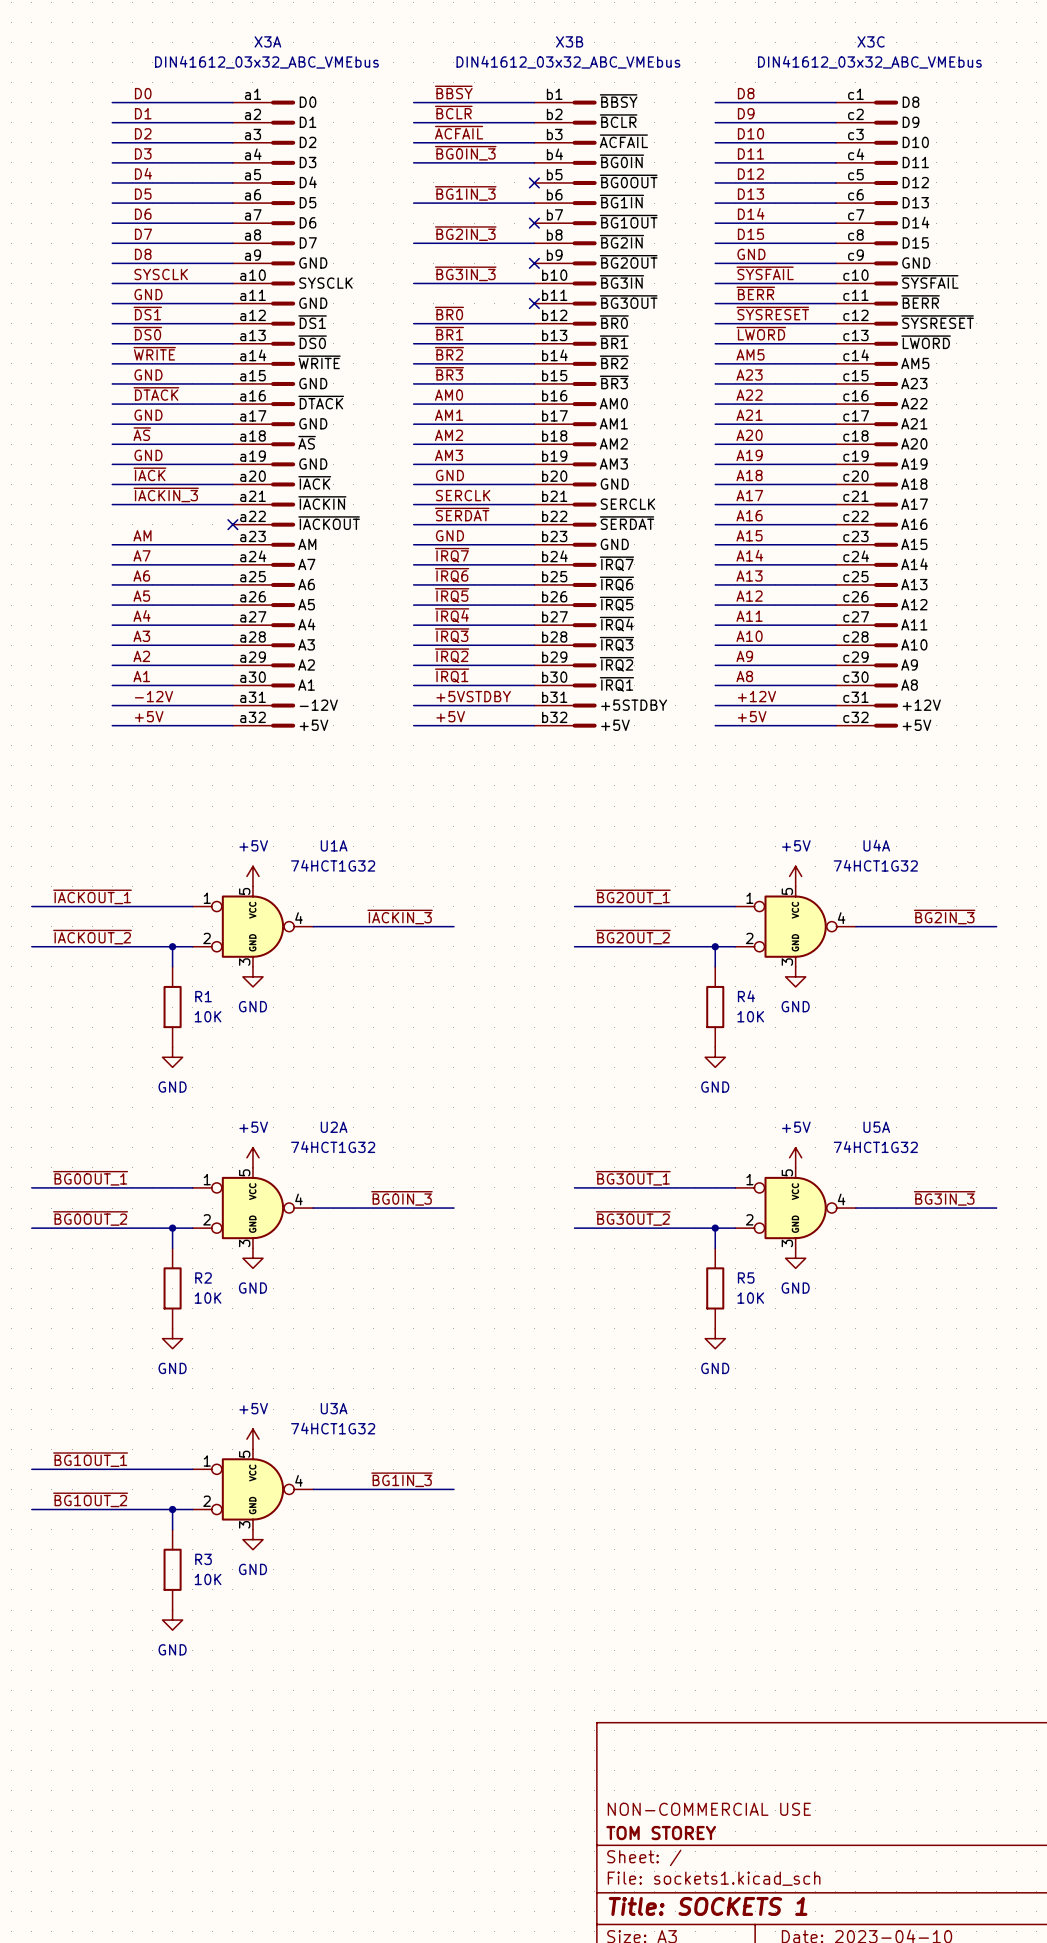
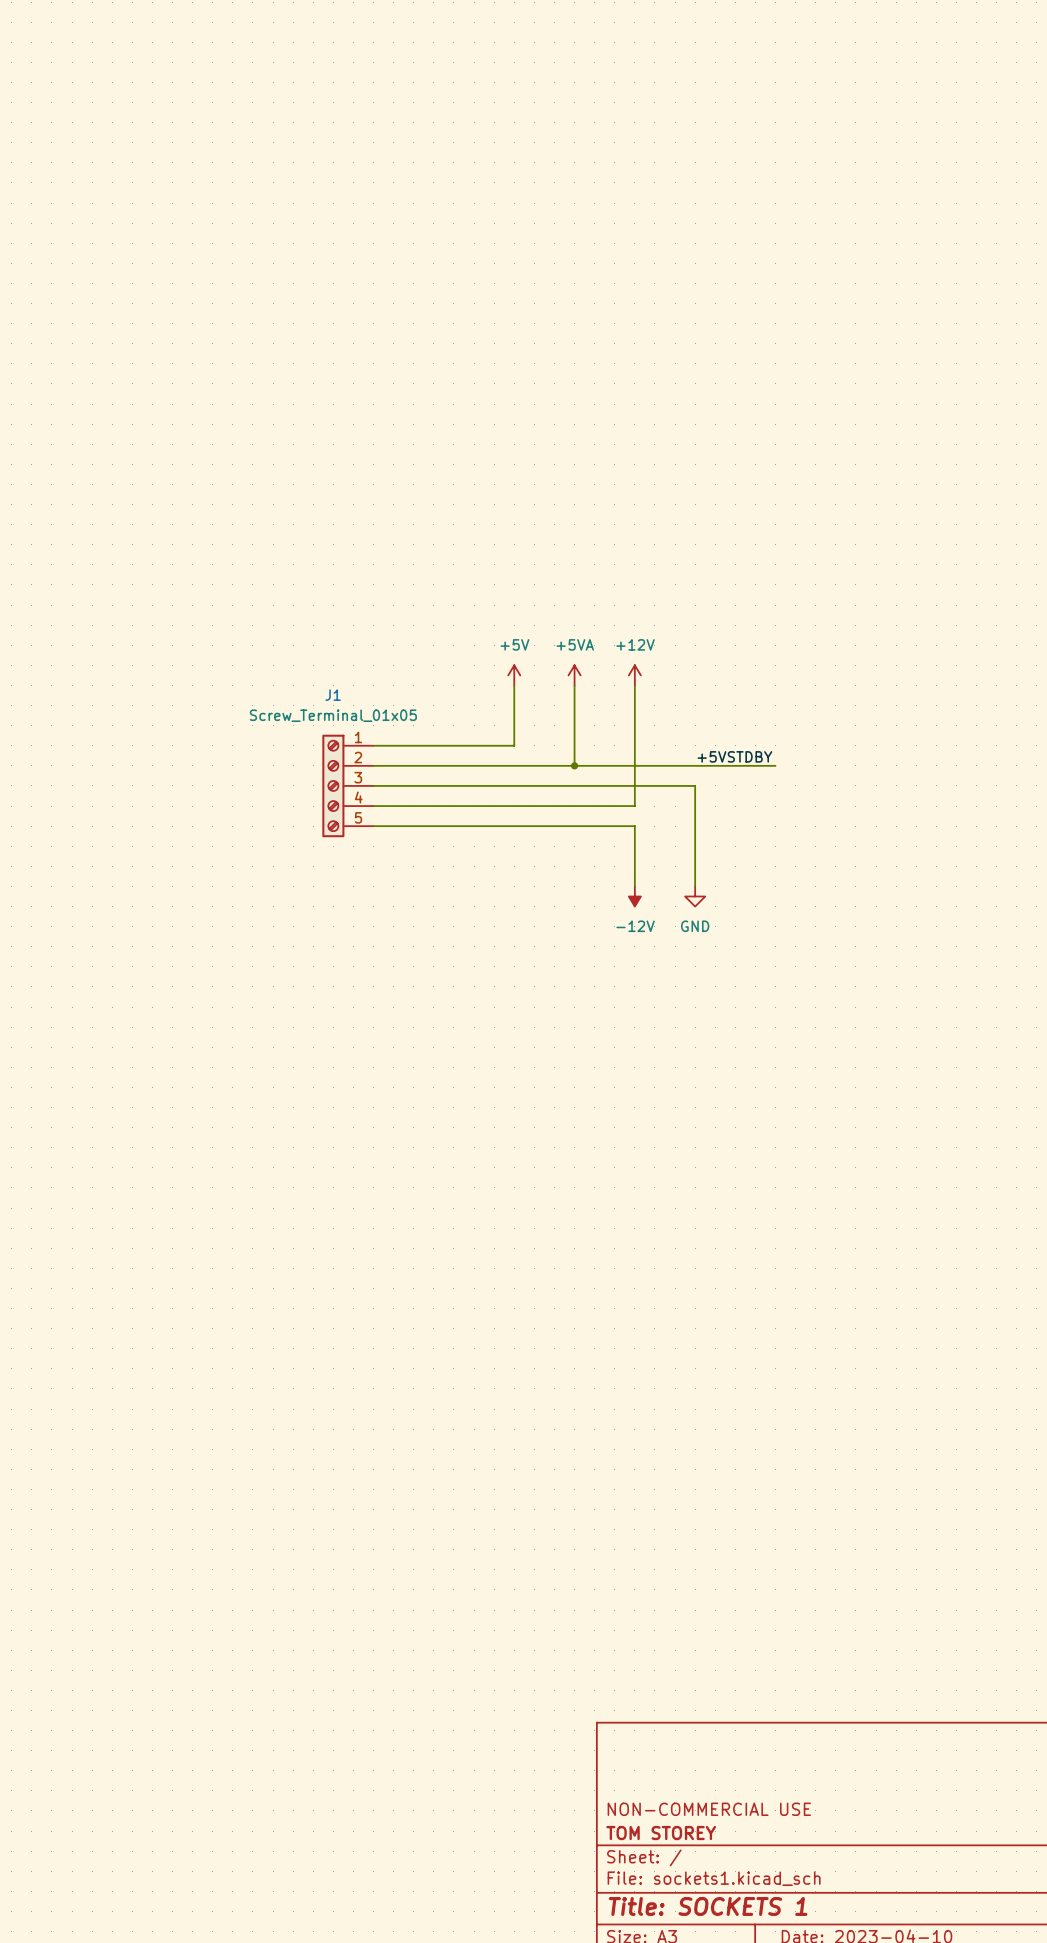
label: ~{BBSY} (453, 92) -> none
label: D0 (143, 93) -> none
label: D8 (746, 93) -> none
wire: (112, 102) (232, 102) -> none
wire: (413, 102) (534, 102) -> none
wire: (715, 102) (835, 102) -> none
label: ~{BCLR} (453, 112) -> none
label: D1 (143, 113) -> none
label: D9 (746, 113) -> none
wire: (112, 122) (232, 122) -> none
wire: (413, 122) (534, 122) -> none
wire: (715, 122) (835, 122) -> none
label: ~{ACFAIL} (459, 132) -> none
label: D2 (143, 133) -> none
label: D10 (750, 133) -> none
wire: (112, 142) (232, 142) -> none
wire: (413, 142) (534, 142) -> none
wire: (715, 142) (835, 142) -> none
label: D3 (143, 153) -> none
label: ~{BG0IN_3} (465, 153) -> none
label: D11 (750, 153) -> none
wire: (112, 162) (232, 162) -> none
wire: (413, 162) (534, 162) -> none
wire: (715, 162) (835, 162) -> none
label: D4 (143, 173) -> none
label: D12 (750, 174) -> none
wire: (112, 182) (232, 182) -> none
no-connect mark: (534, 182) -> none
wire: (715, 182) (835, 182) -> none
label: ~{BG1IN_3} (465, 193) -> none
label: D5 (143, 194) -> none
label: D13 (750, 194) -> none
wire: (112, 203) (232, 203) -> none
wire: (413, 203) (534, 203) -> none
wire: (715, 203) (835, 203) -> none
label: D14 (751, 213) -> none
label: D6 (143, 214) -> none
wire: (112, 223) (232, 223) -> none
no-connect mark: (534, 223) -> none
wire: (715, 223) (835, 223) -> none
label: ~{BG2IN_3} (465, 233) -> none
label: D7 (143, 234) -> none
label: D15 (750, 234) -> none
wire: (112, 243) (232, 243) -> none
wire: (413, 243) (534, 243) -> none
wire: (715, 243) (835, 243) -> none
label: D8 (143, 254) -> none
label: GND (751, 254) -> none
wire: (112, 263) (232, 263) -> none
no-connect mark: (534, 263) -> none
wire: (715, 263) (835, 263) -> none
label: ~{BG3IN_3} (465, 273) -> none
label: ~{SYSFAIL} (765, 273) -> none
label: SYSCLK (161, 274) -> none
wire: (112, 283) (232, 283) -> none
wire: (413, 283) (534, 283) -> none
wire: (715, 283) (835, 283) -> none
label: ~{BERR} (755, 293) -> none
label: GND (148, 294) -> none
wire: (112, 303) (232, 303) -> none
no-connect mark: (534, 303) -> none
wire: (715, 303) (835, 303) -> none
label: ~{DS1} (147, 313) -> none
label: ~{BR0} (449, 313) -> none
label: ~{SYSRESET} (772, 313) -> none
wire: (112, 323) (232, 323) -> none
wire: (413, 323) (534, 323) -> none
wire: (715, 323) (835, 323) -> none
label: ~{DS0} (147, 333) -> none
label: ~{BR1} (449, 333) -> none
label: ~{LWORD} (761, 333) -> none
wire: (112, 343) (232, 343) -> none
wire: (413, 343) (534, 343) -> none
wire: (715, 343) (835, 343) -> none
label: ~{WRITE} (154, 353) -> none
label: ~{BR2} (449, 353) -> none
label: AM5 (750, 354) -> none
wire: (112, 363) (232, 363) -> none
wire: (413, 363) (534, 363) -> none
wire: (715, 363) (835, 363) -> none
label: ~{BR3} (449, 373) -> none
label: GND (148, 375) -> none
label: A23 (749, 375) -> none
wire: (112, 383) (232, 383) -> none
wire: (413, 383) (534, 383) -> none
wire: (715, 383) (835, 383) -> none
label: ~{DTACK} (156, 393) -> none
label: AM0 (449, 395) -> none
label: A22 (749, 395) -> none
wire: (112, 404) (232, 404) -> none
wire: (413, 404) (534, 404) -> none
wire: (715, 404) (835, 404) -> none
X3A: DIN41612_03x32_ABC_VMEbus (264, 414) -> none
X3B: DIN41612_03x32_ABC_VMEbus (565, 414) -> none
X3C: DIN41612_03x32_ABC_VMEbus (867, 414) -> none
label: GND (148, 415) -> none
label: AM1 (449, 415) -> none
label: A21 (749, 415) -> none
wire: (112, 424) (232, 424) -> none
wire: (413, 424) (534, 424) -> none
wire: (715, 424) (835, 424) -> none
label: ~{AS} (142, 434) -> none
label: AM2 (449, 435) -> none
label: A20 (749, 435) -> none
wire: (112, 444) (232, 444) -> none
wire: (413, 444) (534, 444) -> none
wire: (715, 444) (835, 444) -> none
label: GND (148, 455) -> none
label: AM3 (449, 455) -> none
label: A19 (749, 455) -> none
wire: (112, 464) (232, 464) -> none
wire: (413, 464) (534, 464) -> none
wire: (715, 464) (835, 464) -> none
label: ~{IACK} (149, 474) -> none
label: GND (449, 475) -> none
label: A18 (749, 475) -> none
wire: (112, 484) (232, 484) -> none
wire: (413, 484) (534, 484) -> none
wire: (715, 484) (835, 484) -> none
label: ~{IACKIN_3} (166, 494) -> none
label: SERCLK (463, 495) -> none
label: A17 (749, 495) -> none
wire: (112, 504) (232, 504) -> none
wire: (413, 504) (534, 504) -> none
wire: (715, 504) (835, 504) -> none
label: ~{SERDAT} (462, 514) -> none
label: A16 (749, 515) -> none
no-connect mark: (232, 524) -> none
wire: (413, 524) (534, 524) -> none
wire: (715, 524) (835, 524) -> none
label: AM (142, 535) -> none
label: GND (449, 535) -> none
label: A15 (749, 535) -> none
wire: (112, 544) (232, 544) -> none
wire: (413, 544) (534, 544) -> none
wire: (715, 544) (835, 544) -> none
label: A7 (142, 555) -> none
label: ~{IRQ7} (452, 555) -> none
label: A14 (749, 555) -> none
wire: (112, 564) (232, 564) -> none
wire: (413, 564) (534, 564) -> none
wire: (715, 564) (835, 564) -> none
label: A6 (141, 575) -> none
label: ~{IRQ6} (452, 575) -> none
label: A13 (749, 575) -> none
wire: (112, 584) (232, 584) -> none
wire: (413, 584) (534, 584) -> none
wire: (715, 584) (835, 584) -> none
label: ~{IRQ5} (452, 595) -> none
label: A5 (141, 596) -> none
label: A12 (749, 596) -> none
wire: (112, 605) (232, 605) -> none
wire: (413, 605) (534, 605) -> none
wire: (715, 605) (835, 605) -> none
label: A4 (142, 615) -> none
label: ~{IRQ4} (452, 615) -> none
label: A11 (749, 616) -> none
wire: (112, 625) (232, 625) -> none
wire: (413, 625) (534, 625) -> none
wire: (715, 625) (835, 625) -> none
label: ~{IRQ3} (452, 635) -> none
label: A3 (141, 636) -> none
label: A10 (749, 636) -> none
wire: (112, 645) (232, 645) -> none
wire: (413, 645) (534, 645) -> none
wire: (715, 645) (835, 645) -> none
label: ~{IRQ2} (452, 655) -> none
label: A2 (141, 656) -> none
label: A9 (744, 656) -> none
wire: (112, 665) (232, 665) -> none
wire: (413, 665) (534, 665) -> none
wire: (715, 665) (835, 665) -> none
label: ~{IRQ1} (452, 675) -> none
power symbol: none -> +5V (514, 675)
power symbol: none -> +5VA (574, 675)
power symbol: none -> +12V (634, 675)
label: A1 (141, 676) -> none
label: A8 (744, 676) -> none
wire: (112, 685) (232, 685) -> none
wire: (413, 685) (534, 685) -> none
wire: none -> (514, 685) (514, 745) (373, 745)
wire: none -> (574, 685) (574, 765)
wire: none -> (634, 685) (634, 806) (373, 806)
wire: (715, 685) (835, 685) -> none
label: -12V (153, 696) -> none
label: +5VSTDBY (473, 696) -> none
label: +12V (756, 696) -> none
wire: (112, 705) (232, 705) -> none
wire: (413, 705) (534, 705) -> none
wire: (715, 705) (835, 705) -> none
label: +5V (149, 716) -> none
label: +5V (450, 716) -> none
label: +5V (752, 716) -> none
wire: (112, 725) (232, 725) -> none
wire: (413, 725) (534, 725) -> none
wire: (715, 725) (835, 725) -> none
label: none -> +5VSTDBY (734, 756)
wire: none -> (373, 765) (775, 765)
junction: none -> (574, 765)
J1: none -> Screw_Terminal_01x05 (347, 785)
wire: none -> (373, 785) (695, 785) (695, 886)
wire: none -> (373, 826) (634, 826) (634, 886)
power symbol: +5V (252, 876) -> none
power symbol: +5V (795, 876) -> none
label: ~{IACKOUT_1} (92, 896) -> none
label: ~{BG2OUT_1} (633, 896) -> none
power symbol: none -> -12V (634, 896)
power symbol: none -> GND (695, 896)
wire: (31, 906) (192, 906) -> none
wire: (574, 906) (735, 906) -> none
label: ~{IACKIN_3} (400, 917) -> none
label: ~{BG2IN_3} (944, 917) -> none
part: (252, 926) -> none
U1A: 74HCT1G32 (252, 926) -> none
wire: (313, 926) (453, 926) -> none
part: (795, 926) -> none
U4A: 74HCT1G32 (795, 926) -> none
wire: (855, 926) (996, 926) -> none
label: ~{IACKOUT_2} (92, 937) -> none
label: ~{BG2OUT_2} (633, 937) -> none
wire: (31, 946) (192, 946) -> none
wire: (172, 946) (172, 966) -> none
junction: (172, 946) -> none
wire: (574, 946) (735, 946) -> none
wire: (715, 946) (715, 966) -> none
junction: (715, 946) -> none
power symbol: GND (252, 976) -> none
power symbol: GND (795, 976) -> none
R1: 10K (172, 1007) -> none
R4: 10K (715, 1007) -> none
power symbol: GND (172, 1057) -> none
power symbol: GND (715, 1057) -> none
power symbol: +5V (252, 1157) -> none
power symbol: +5V (795, 1157) -> none
label: ~{BG0OUT_1} (90, 1178) -> none
label: ~{BG3OUT_1} (633, 1178) -> none
wire: (31, 1187) (192, 1187) -> none
wire: (574, 1187) (735, 1187) -> none
label: ~{BG0IN_3} (401, 1198) -> none
label: ~{BG3IN_3} (944, 1198) -> none
U2A: 74HCT1G32 (252, 1208) -> none
part: (252, 1208) -> none
wire: (313, 1208) (453, 1208) -> none
part: (795, 1208) -> none
U5A: 74HCT1G32 (795, 1208) -> none
wire: (855, 1208) (996, 1208) -> none
label: ~{BG0OUT_2} (90, 1218) -> none
label: ~{BG3OUT_2} (633, 1218) -> none
wire: (31, 1228) (192, 1228) -> none
wire: (172, 1228) (172, 1248) -> none
junction: (172, 1228) -> none
wire: (574, 1228) (735, 1228) -> none
wire: (715, 1228) (715, 1248) -> none
junction: (715, 1228) -> none
power symbol: GND (252, 1258) -> none
power symbol: GND (795, 1258) -> none
R2: 10K (172, 1288) -> none
R5: 10K (715, 1288) -> none
power symbol: GND (172, 1338) -> none
power symbol: GND (715, 1338) -> none
power symbol: +5V (252, 1439) -> none
label: ~{BG1OUT_1} (90, 1459) -> none
wire: (31, 1469) (192, 1469) -> none
label: ~{BG1IN_3} (401, 1479) -> none
U3A: 74HCT1G32 (252, 1489) -> none
part: (252, 1489) -> none
wire: (313, 1489) (453, 1489) -> none
label: ~{BG1OUT_2} (90, 1499) -> none
wire: (31, 1509) (192, 1509) -> none
wire: (172, 1509) (172, 1529) -> none
junction: (172, 1509) -> none
power symbol: GND (252, 1539) -> none
R3: 10K (172, 1569) -> none
power symbol: GND (172, 1620) -> none

